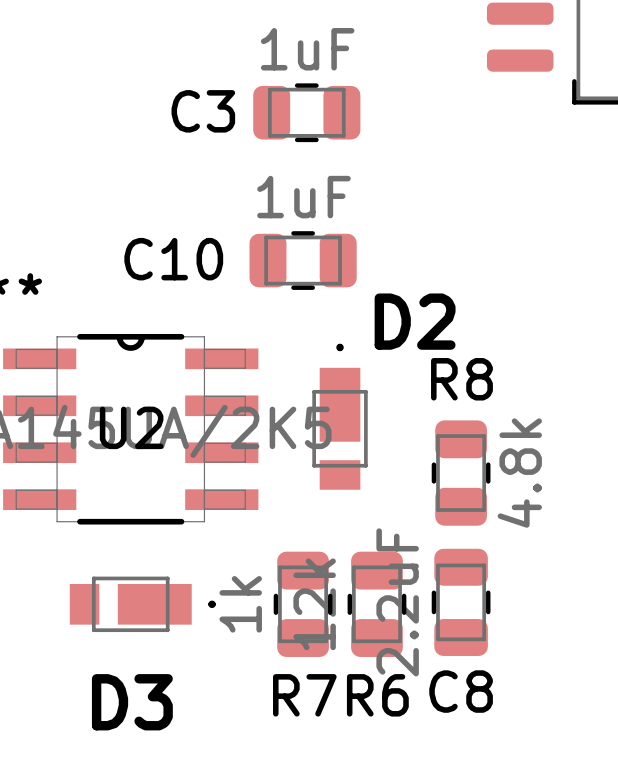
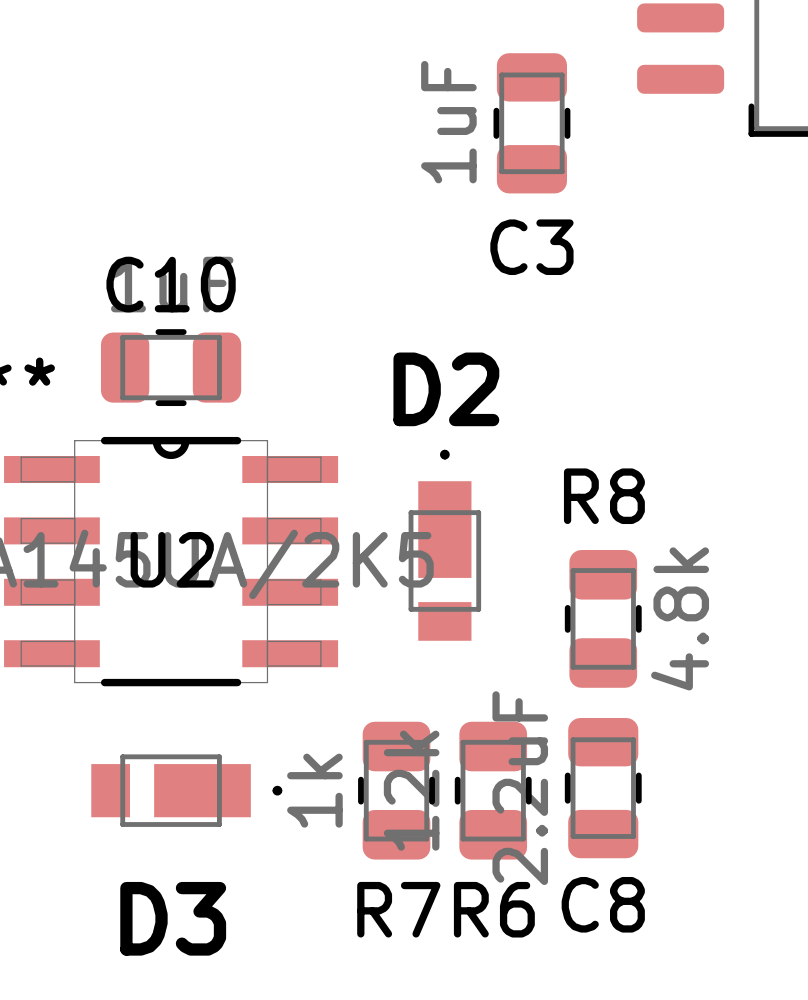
C3 value position: 1uF (307, 49) -> 1uF (448, 122)
C3 name position: C3 (203, 111) -> C3 (531, 247)
C3 rotation: 0° (306, 112) -> 90° clockwise (531, 123)
C3 position: (306, 112) -> (531, 123)
C10 name position: C10 (173, 259) -> C10 (171, 284)
C10 position: (303, 260) -> (171, 367)
D2 name position: D2 (415, 321) -> D2 (446, 389)

